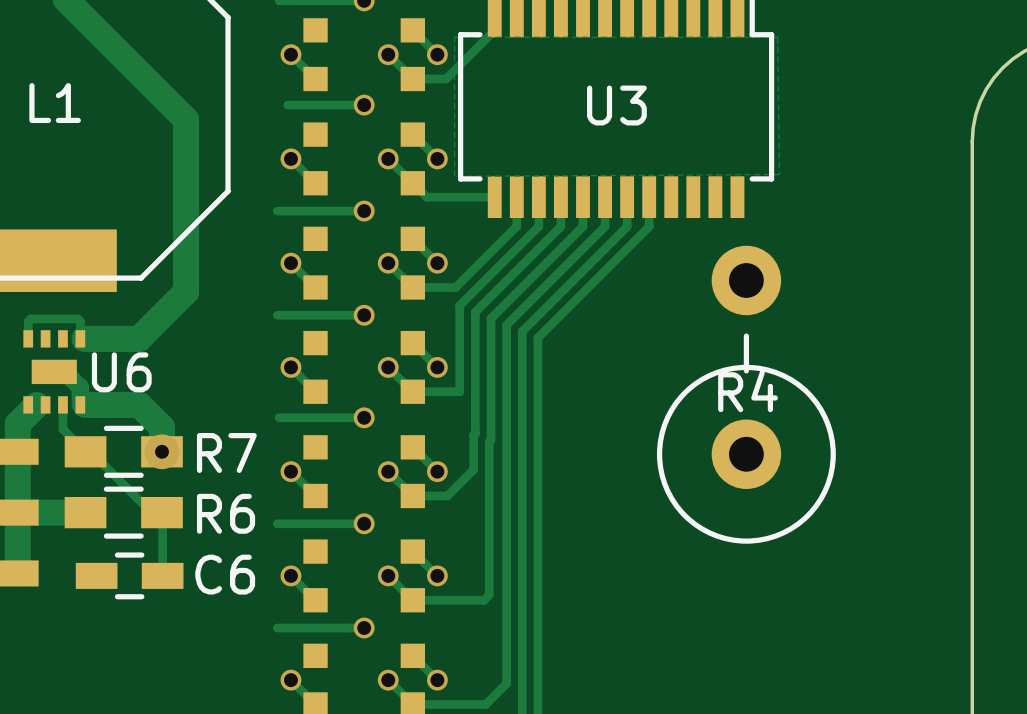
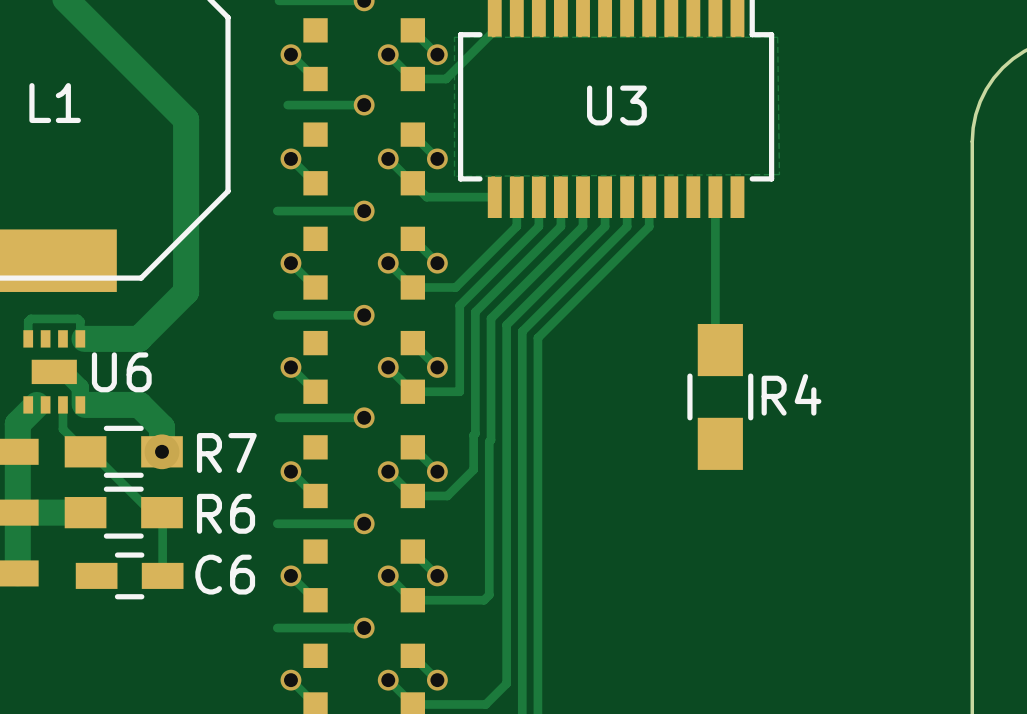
track: none -> (715, 197) (715, 345) (720, 350)
R4 footprint: [656, 245, 836, 544] -> [687, 323, 754, 470]
R4 name position: R4 (748, 391) -> R4 (791, 394)

